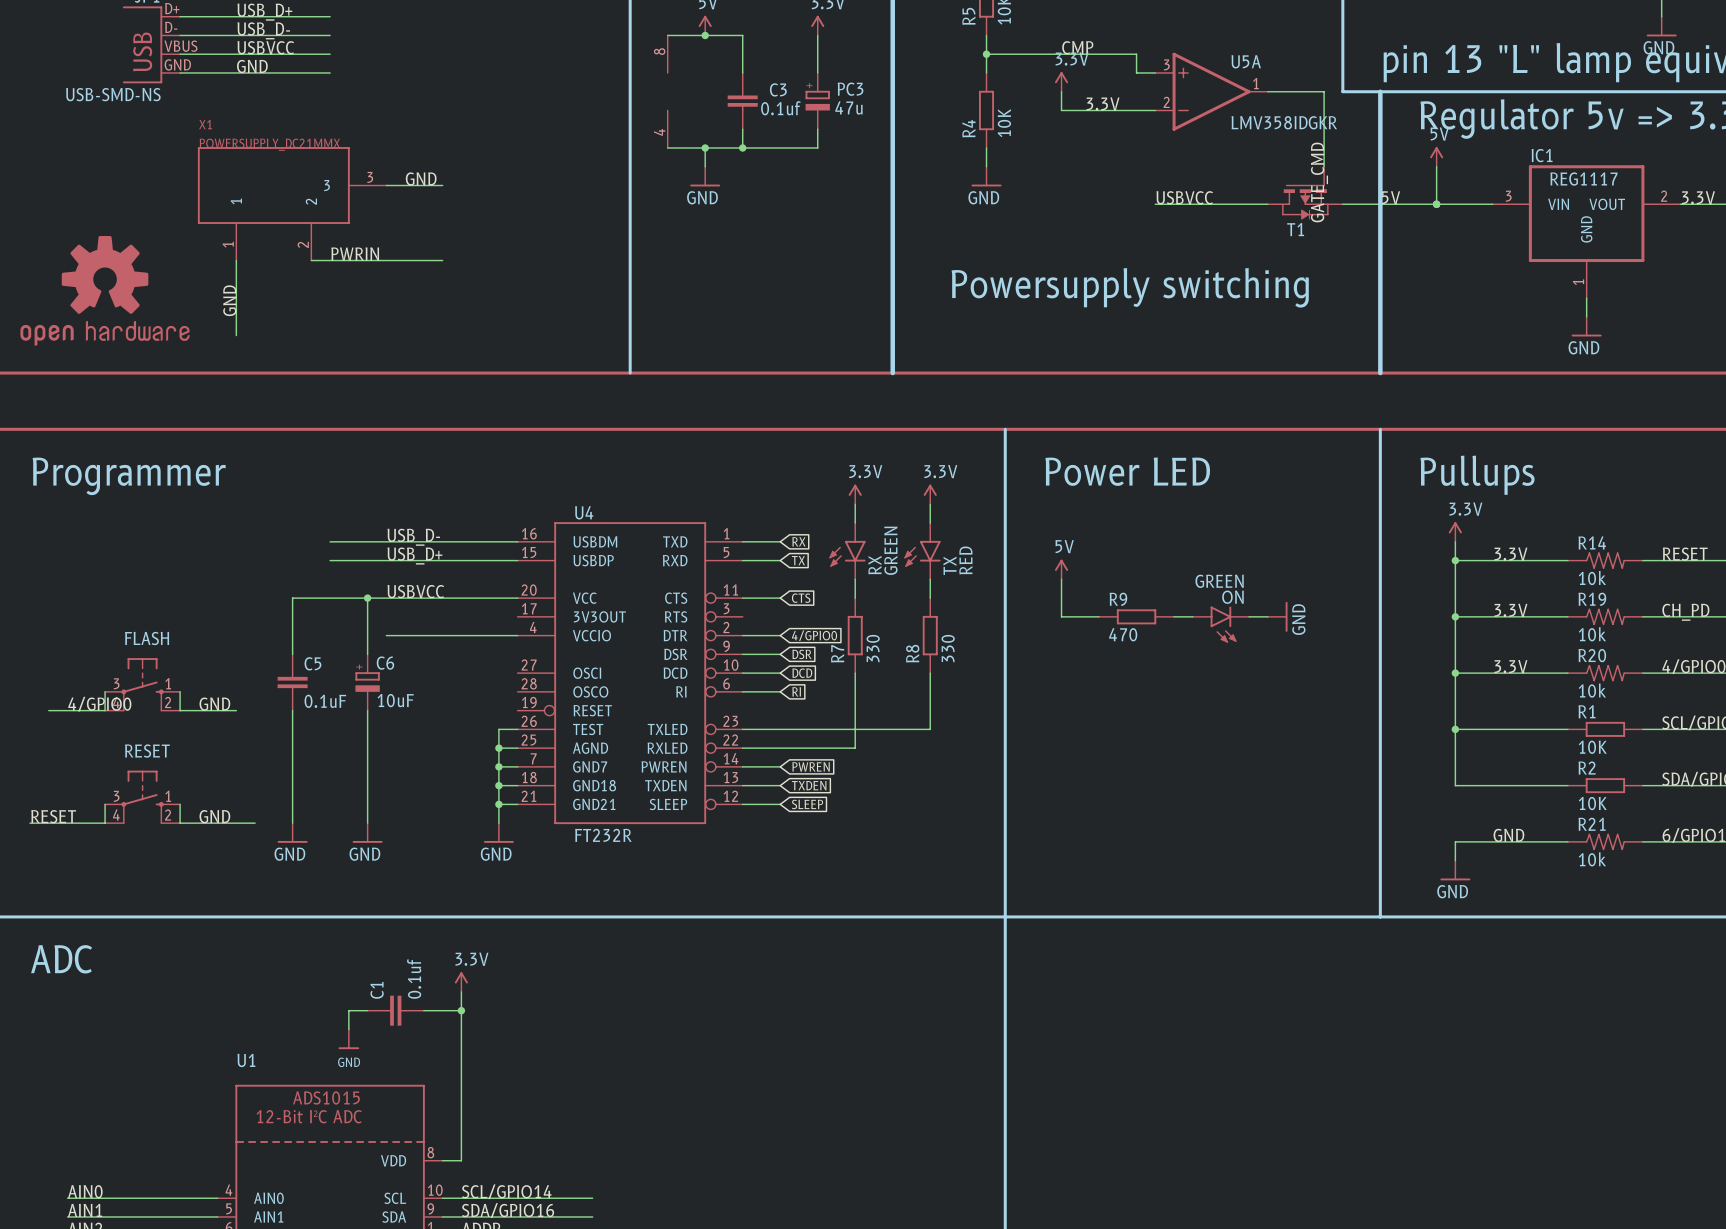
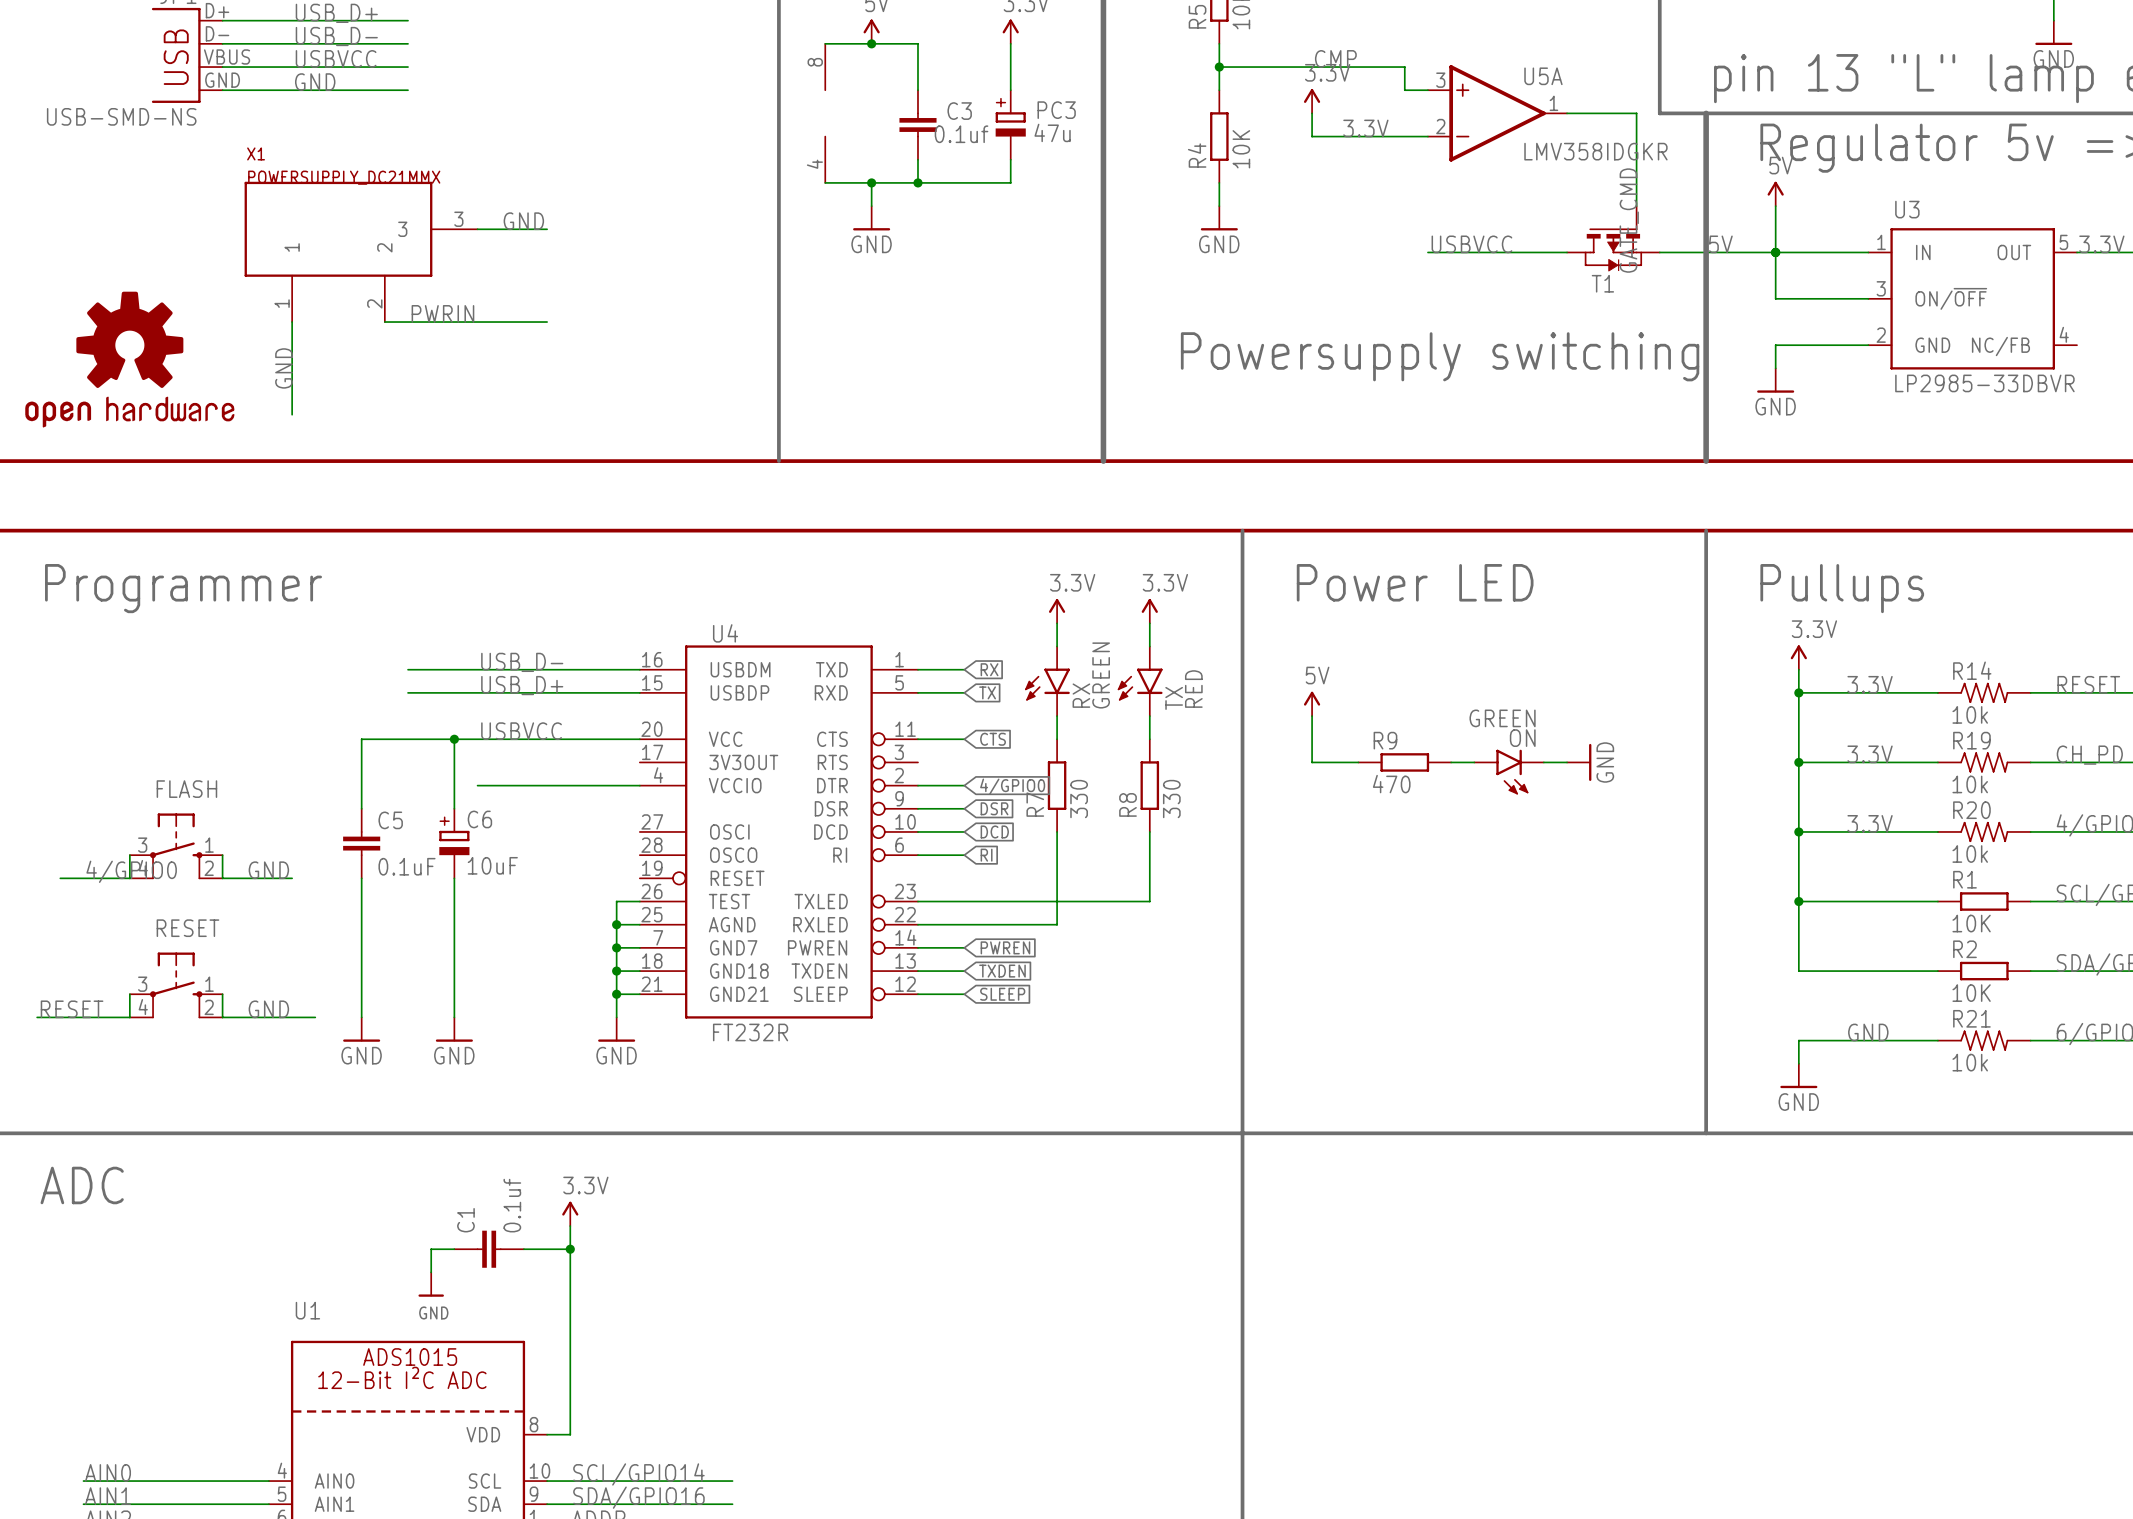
wire: none -> (1775, 252) (1775, 298) (1868, 298)
IC1: REG1117 (1586, 231) -> none
U3: none -> LP2985-33DBVR (1972, 298)
wire: none -> (1868, 345) (1775, 345) (1775, 368)
wire: (1586, 298) (1586, 316) -> none
power symbol position: GND (1586, 326) -> GND (1775, 380)

